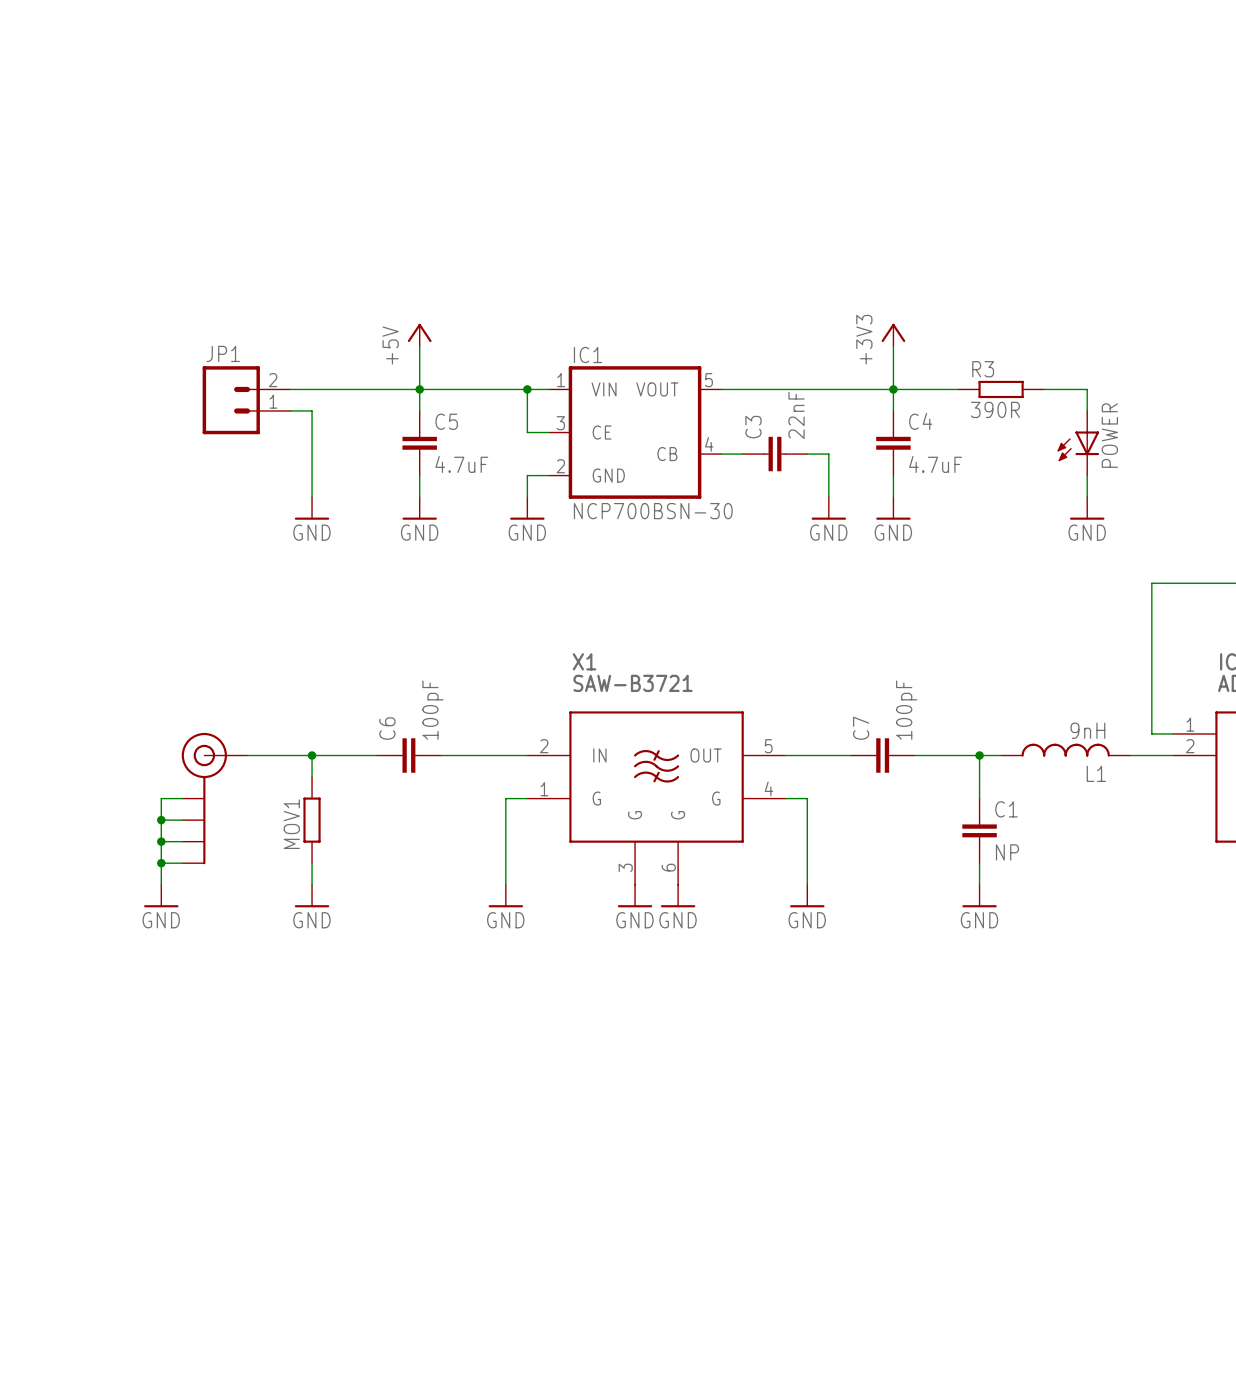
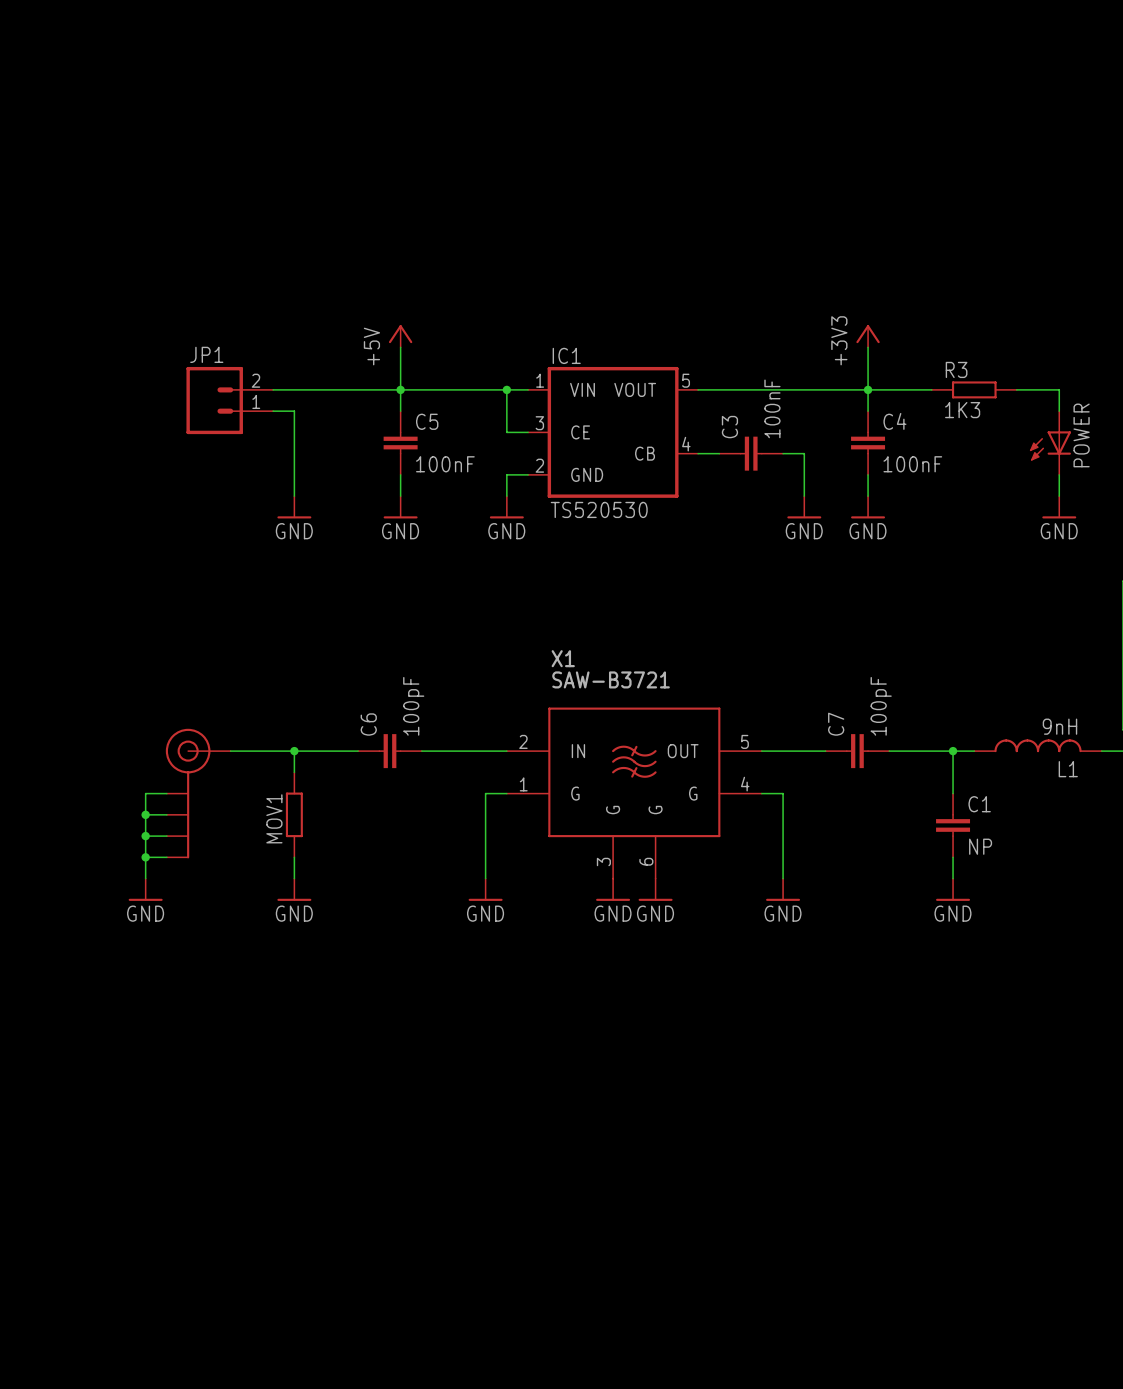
R3 value: 390R (995, 409) -> 1K3 (962, 410)
C3 value: 22nF (796, 415) -> 100nF (772, 408)
C5 value: 4.7uF (461, 464) -> 100nF (445, 464)
C4 value: 4.7uF (935, 464) -> 100nF (912, 464)
IC1 value: NCP700BSN-30 (653, 511) -> TS520530 (599, 509)

